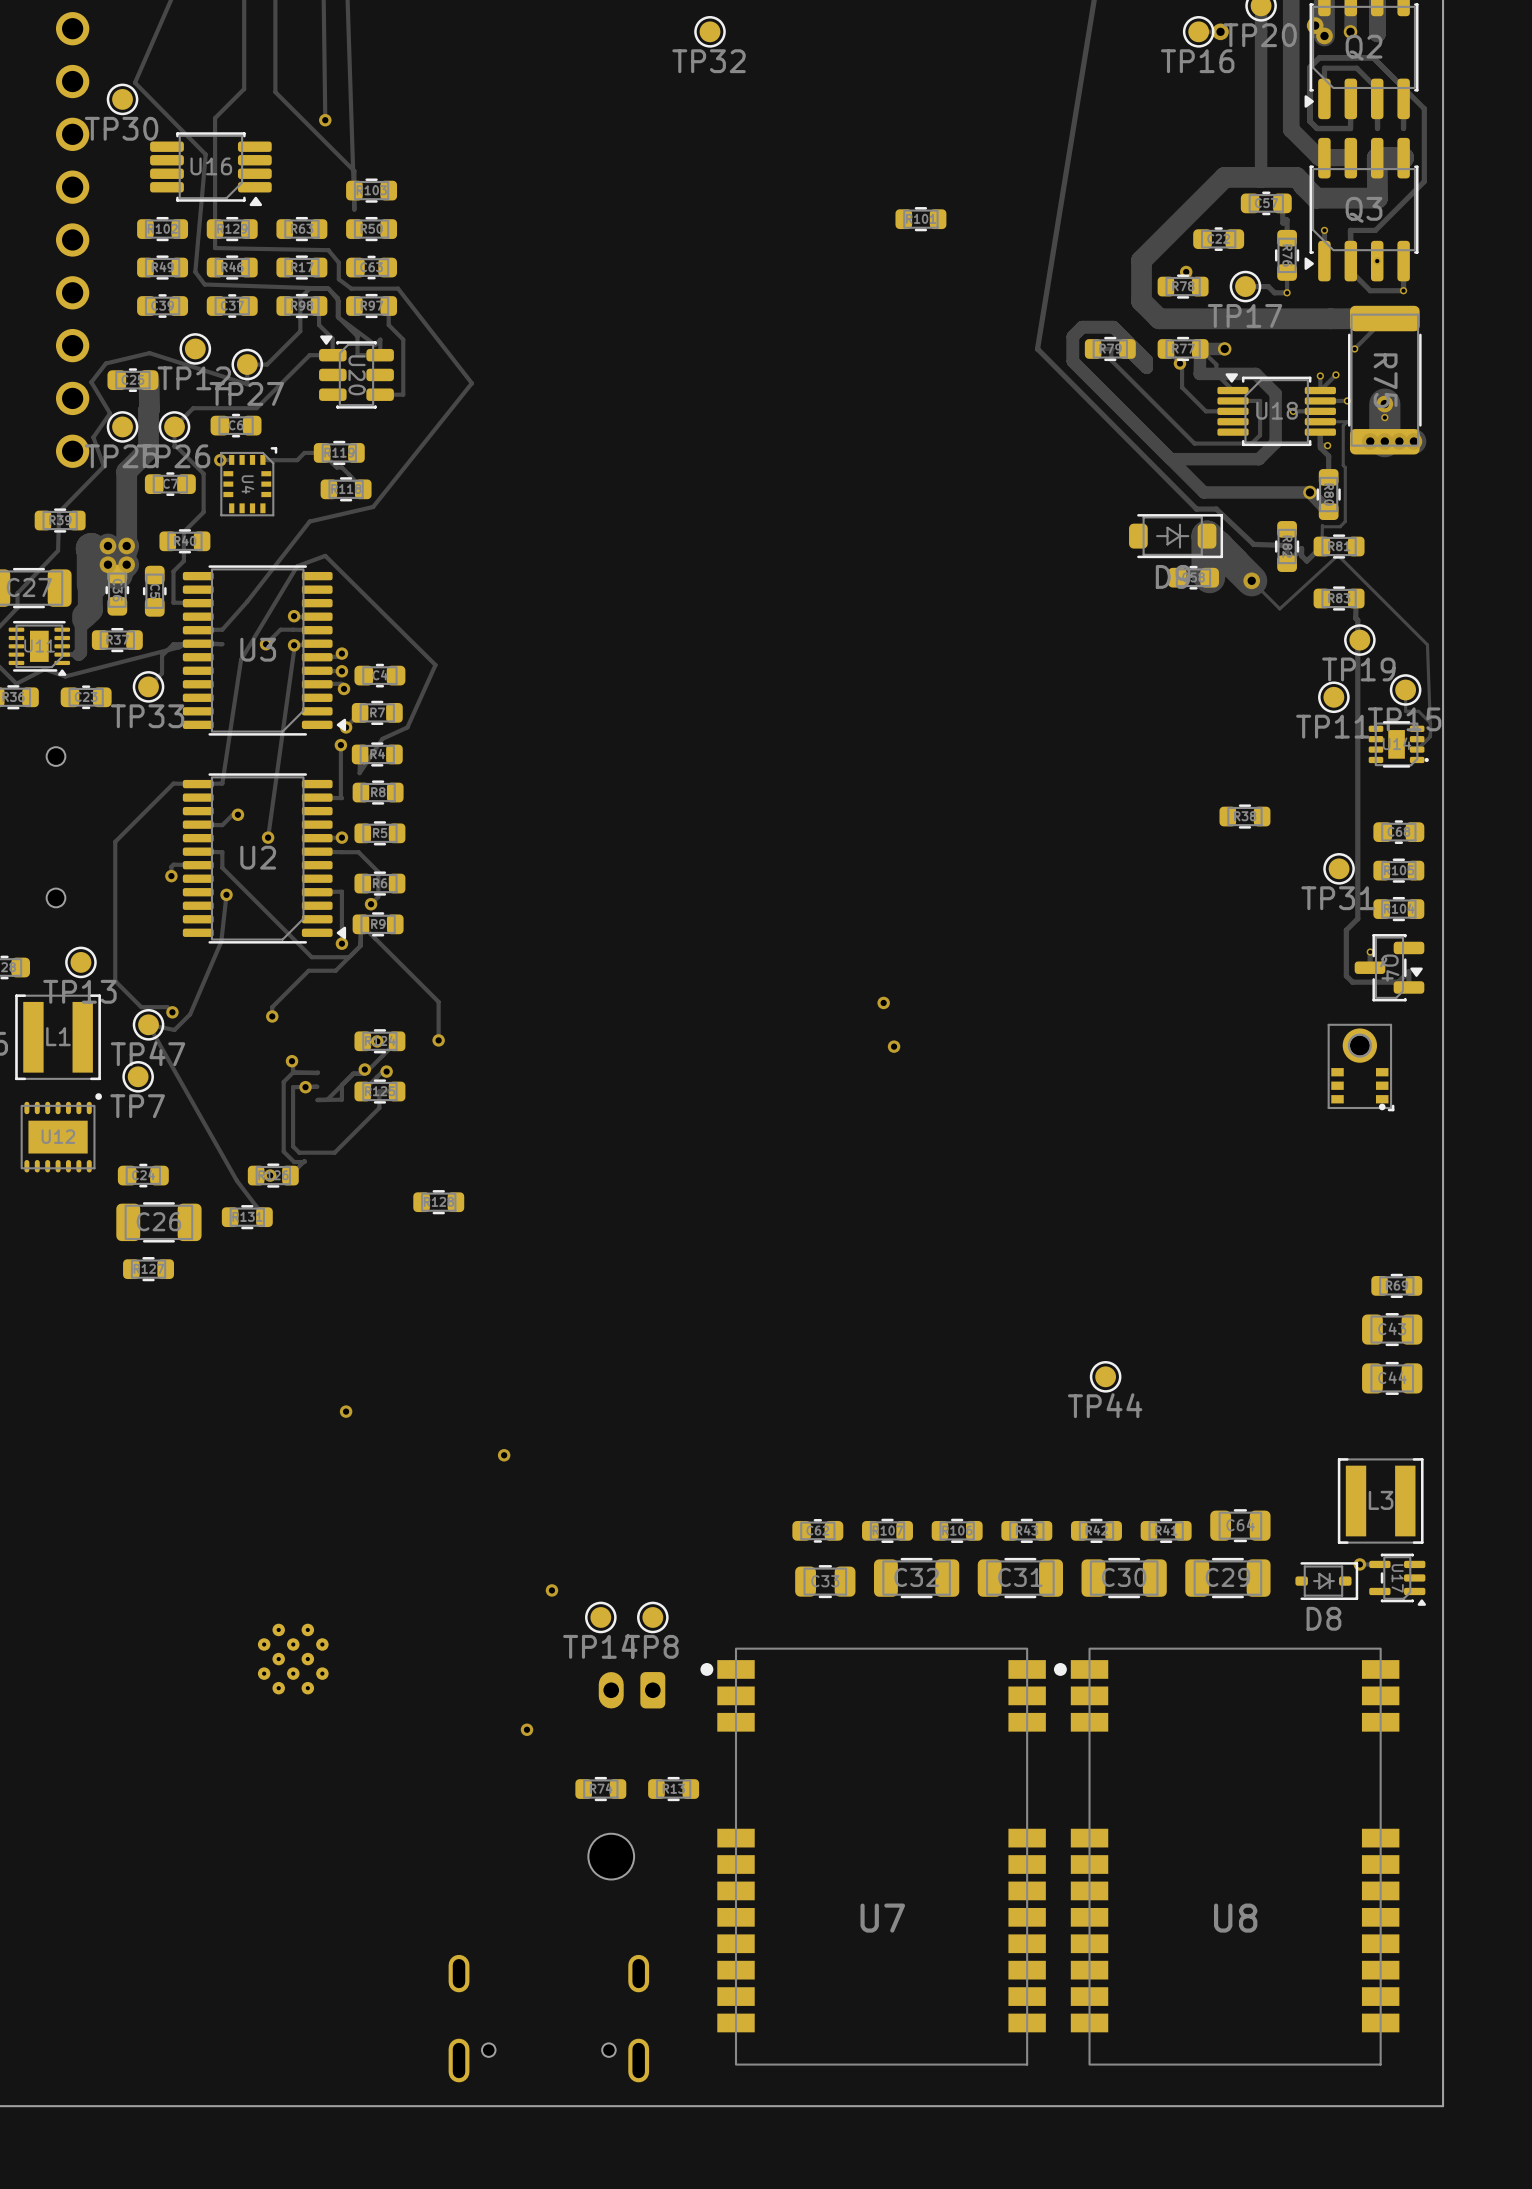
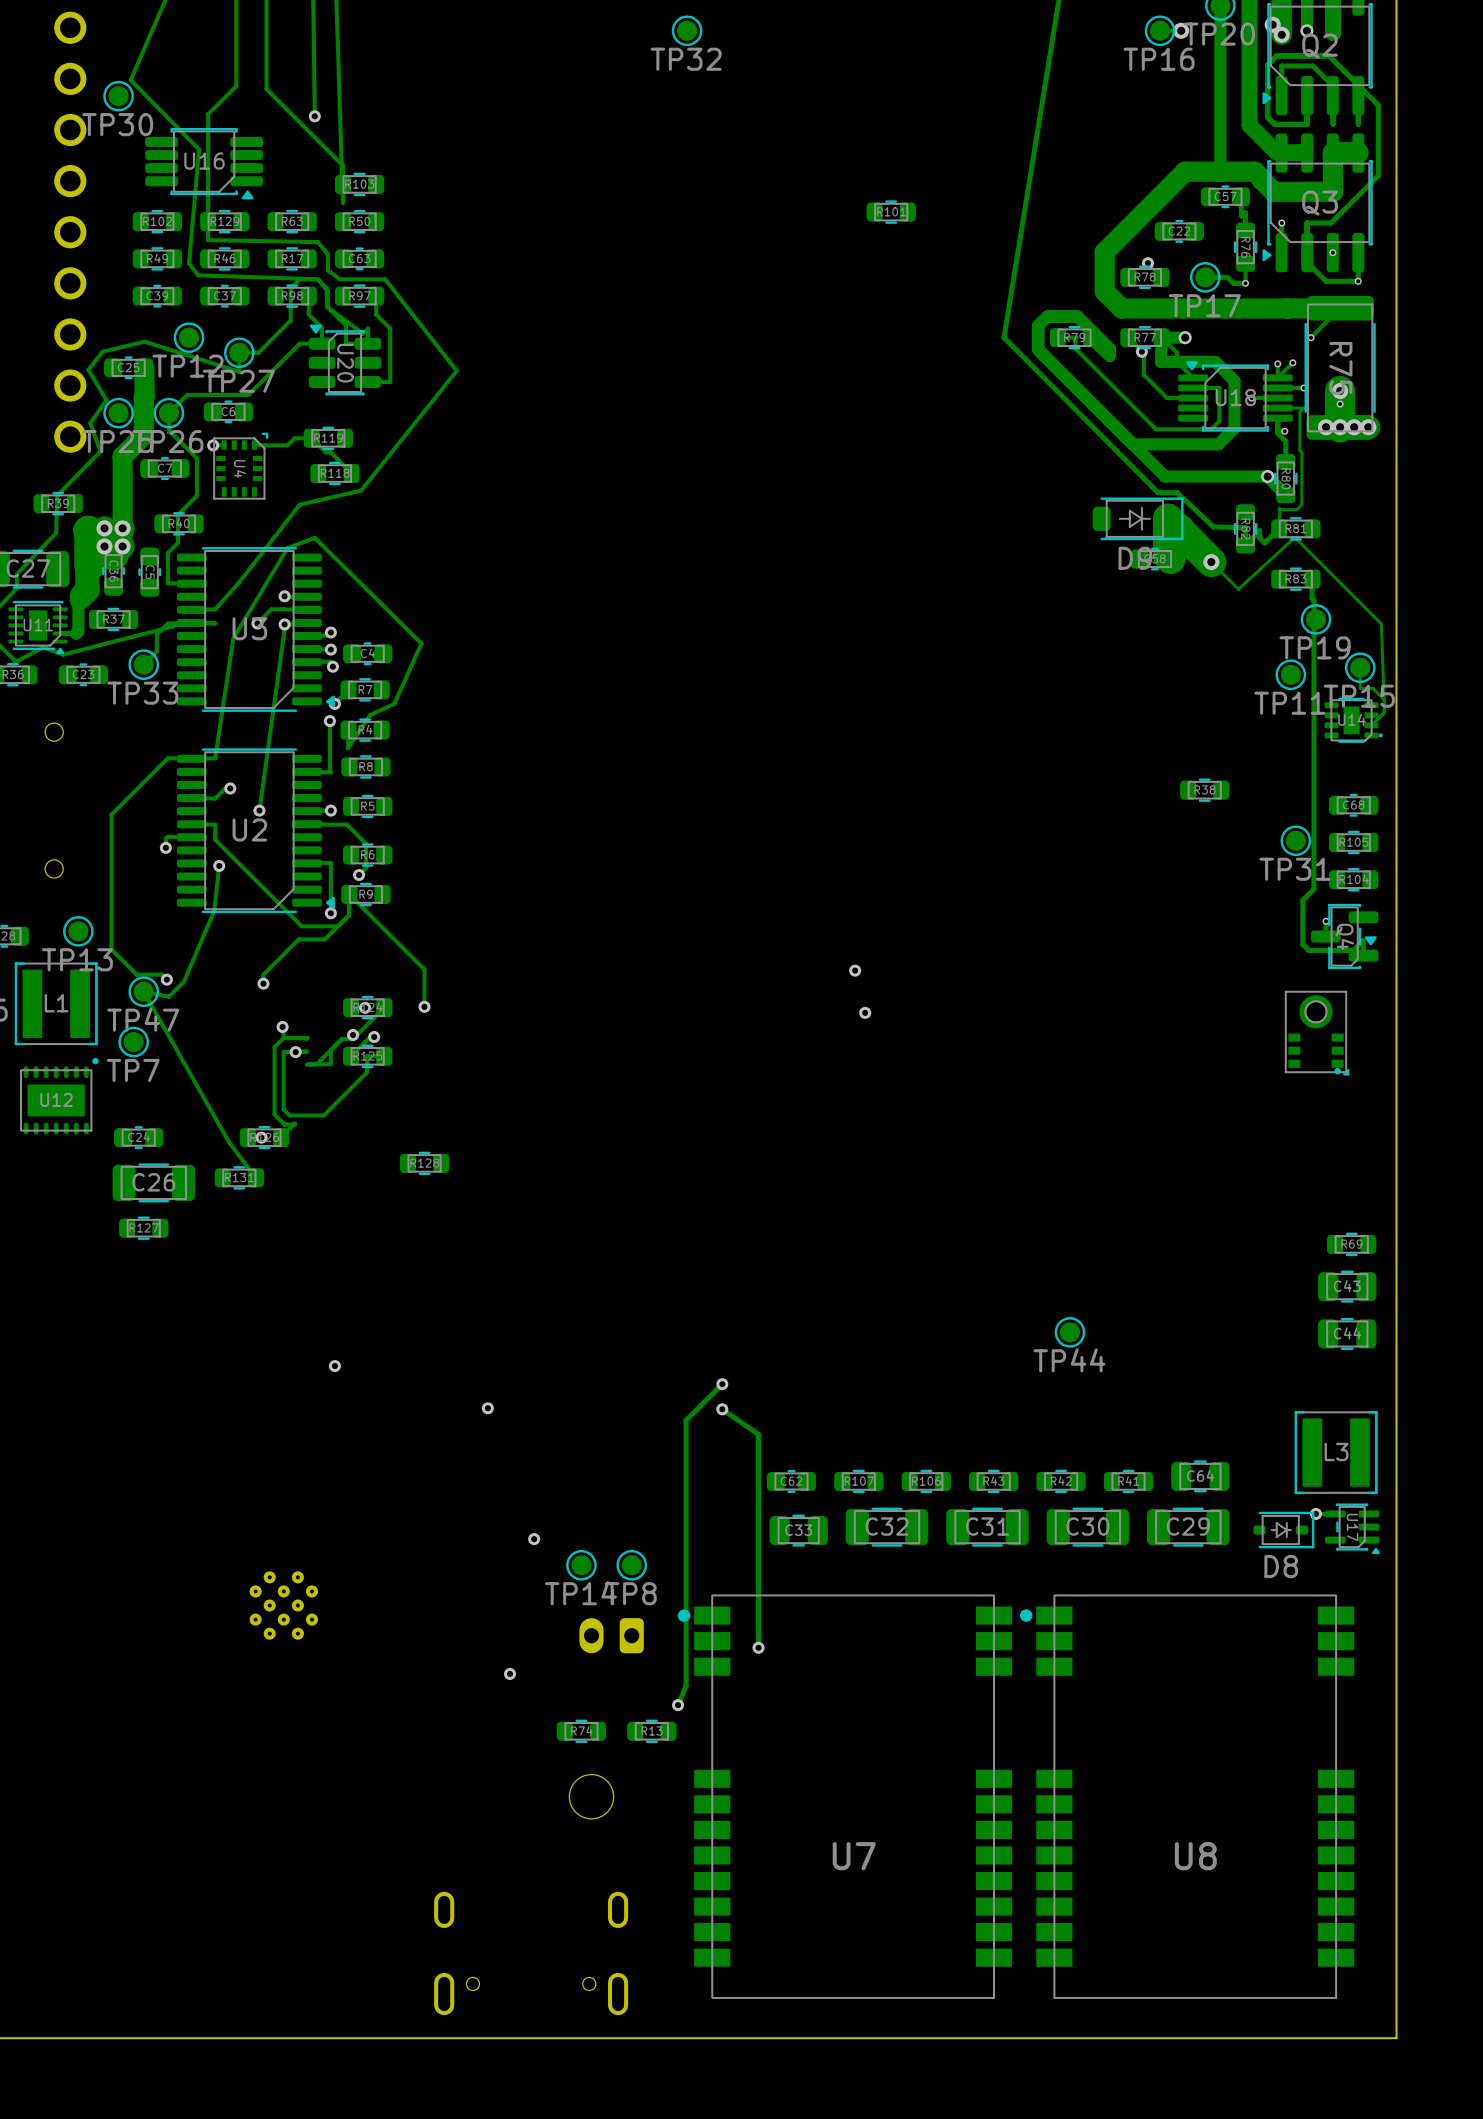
track: none -> (722, 1384) (686, 1420) (686, 1686) (678, 1705)
via: none -> (722, 1384)
track: none -> (722, 1409) (758, 1434) (758, 1647)
via: none -> (722, 1409)
via: none -> (758, 1647)
via: none -> (678, 1705)

